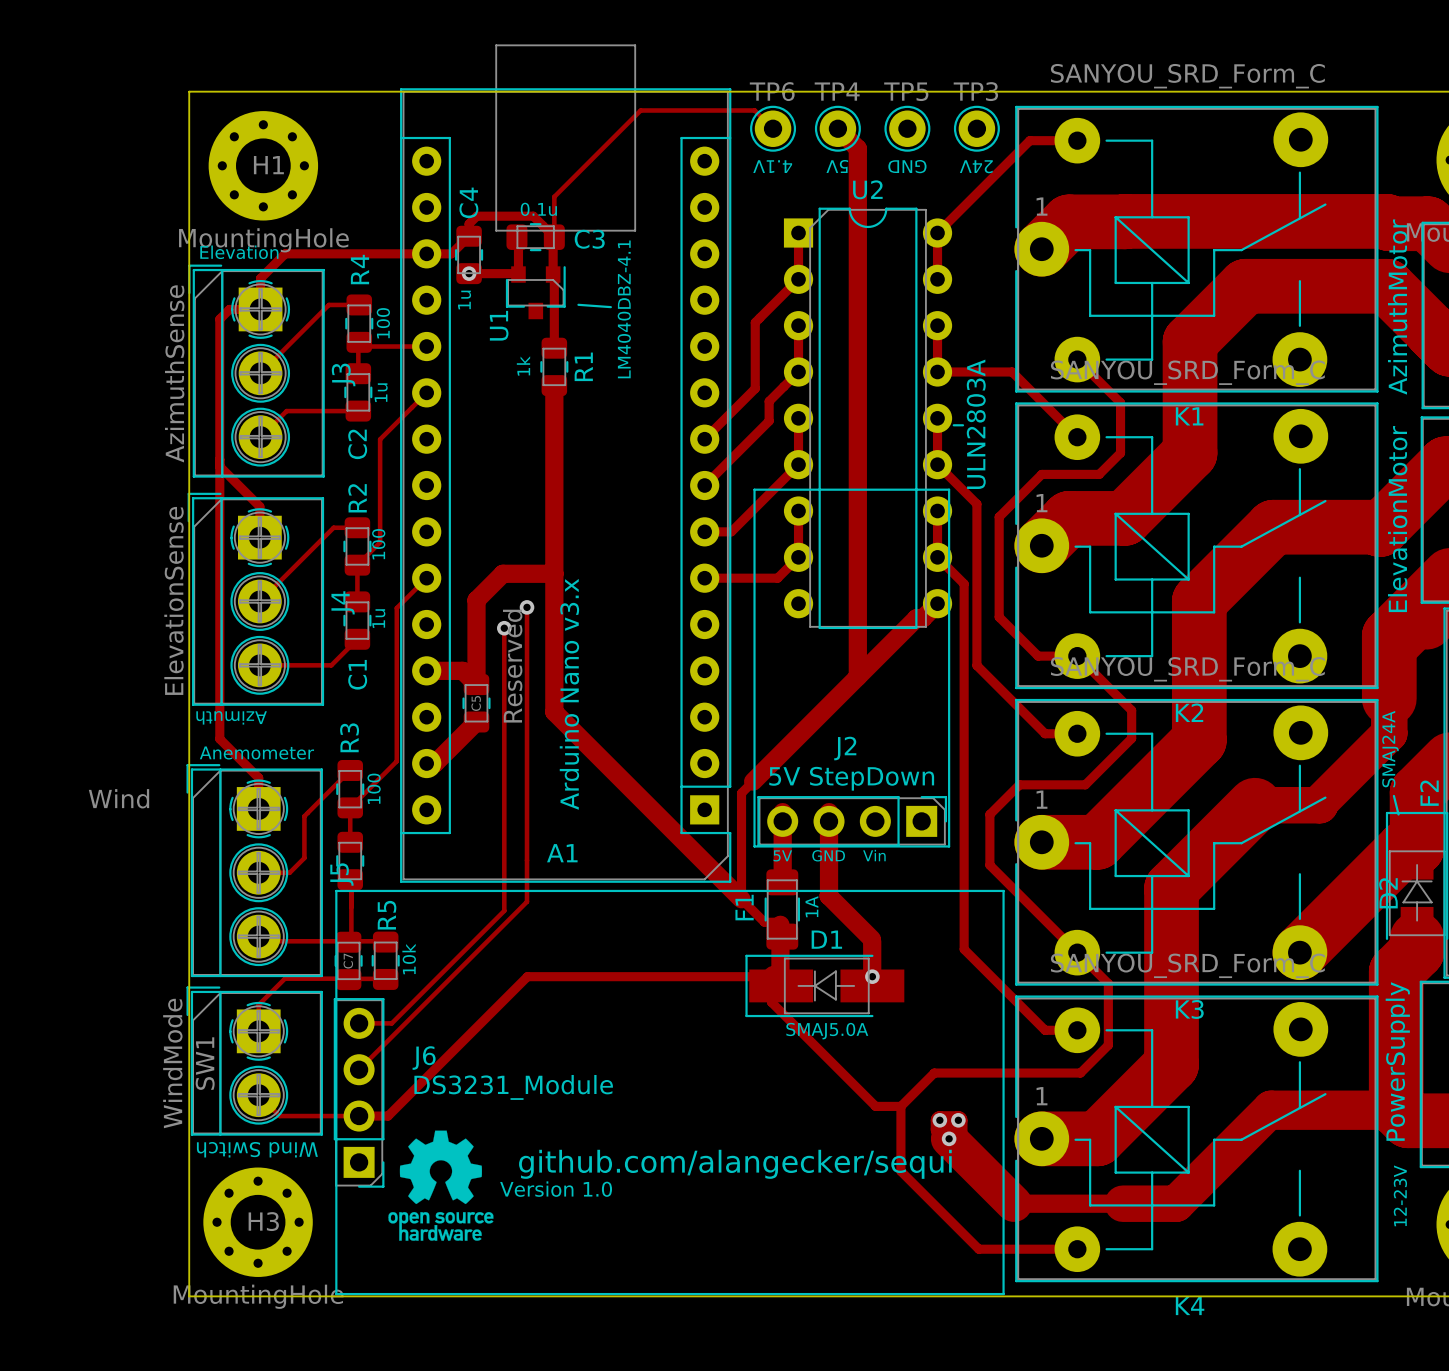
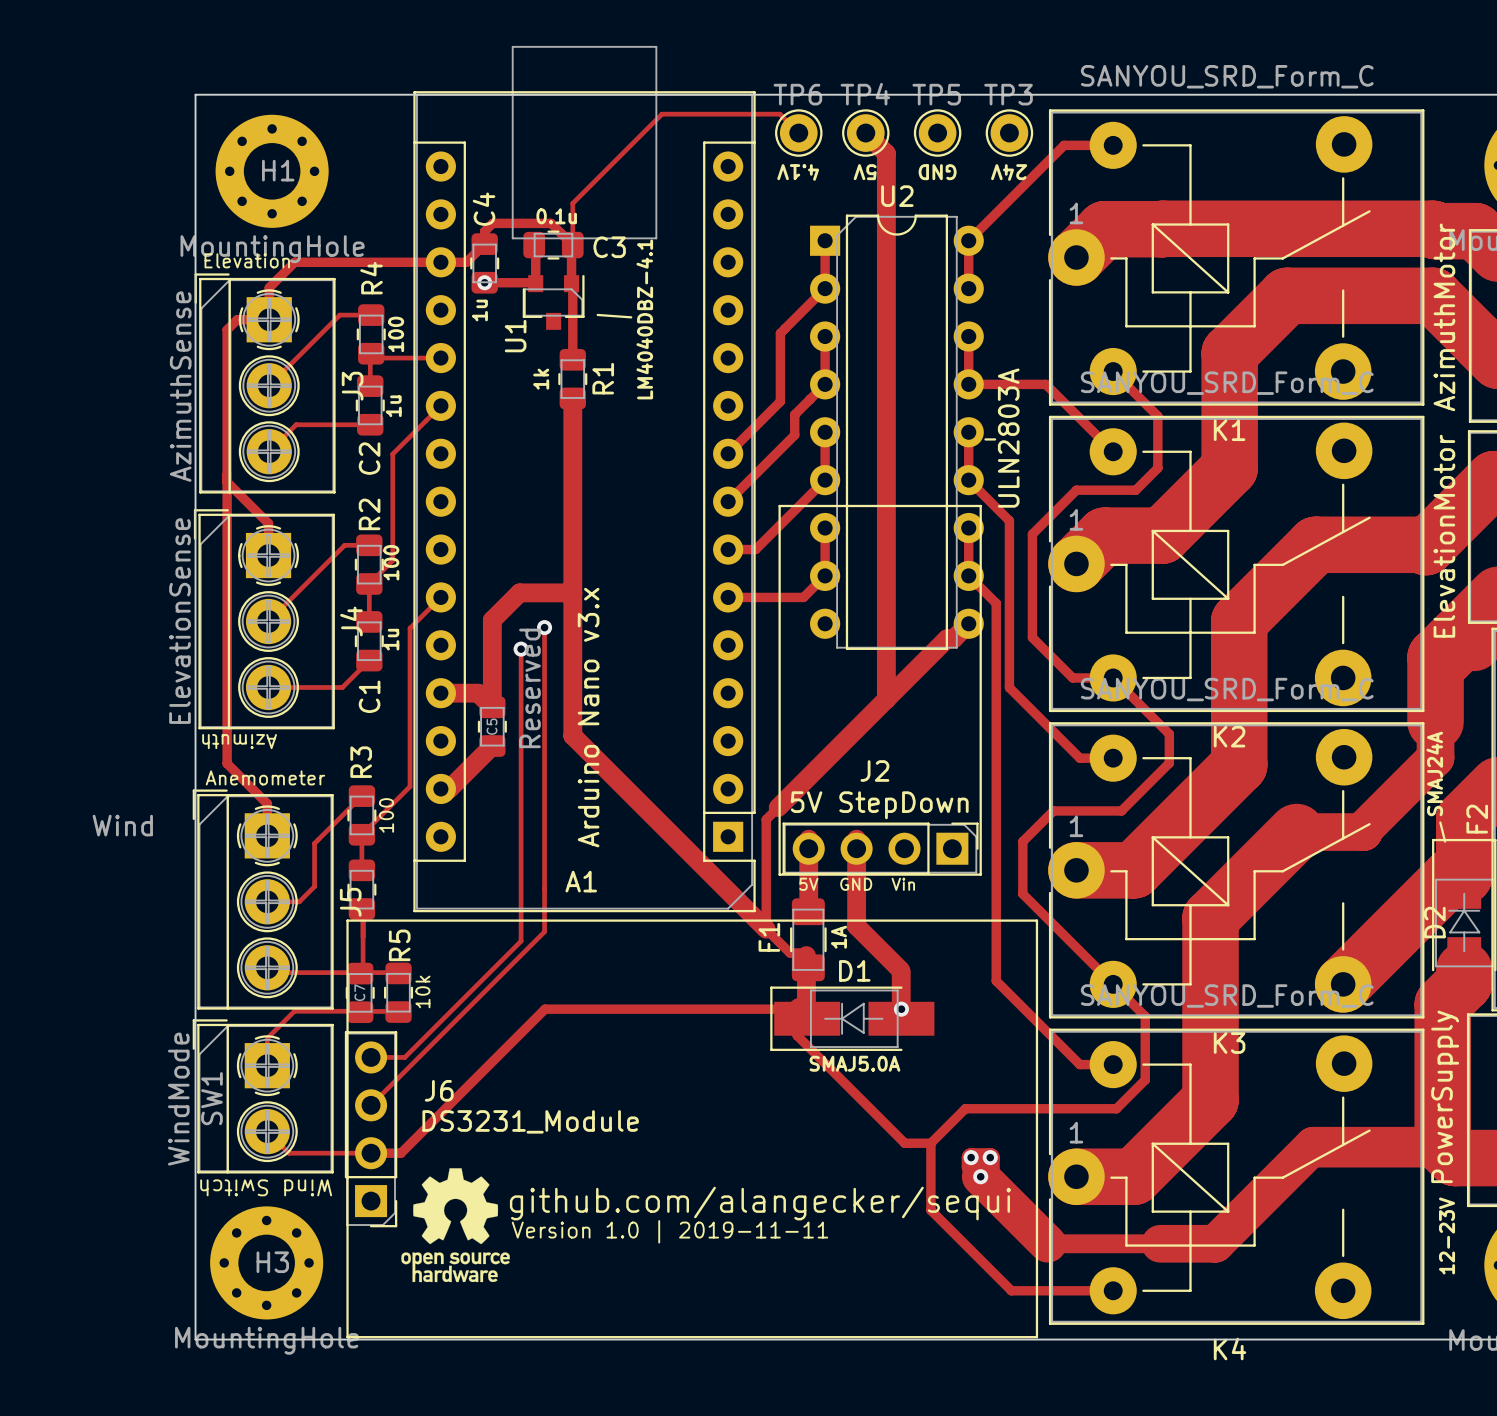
text: Version 1.0 (556, 1189) -> Version 1.0 | 2019-11-11 (669, 1231)

